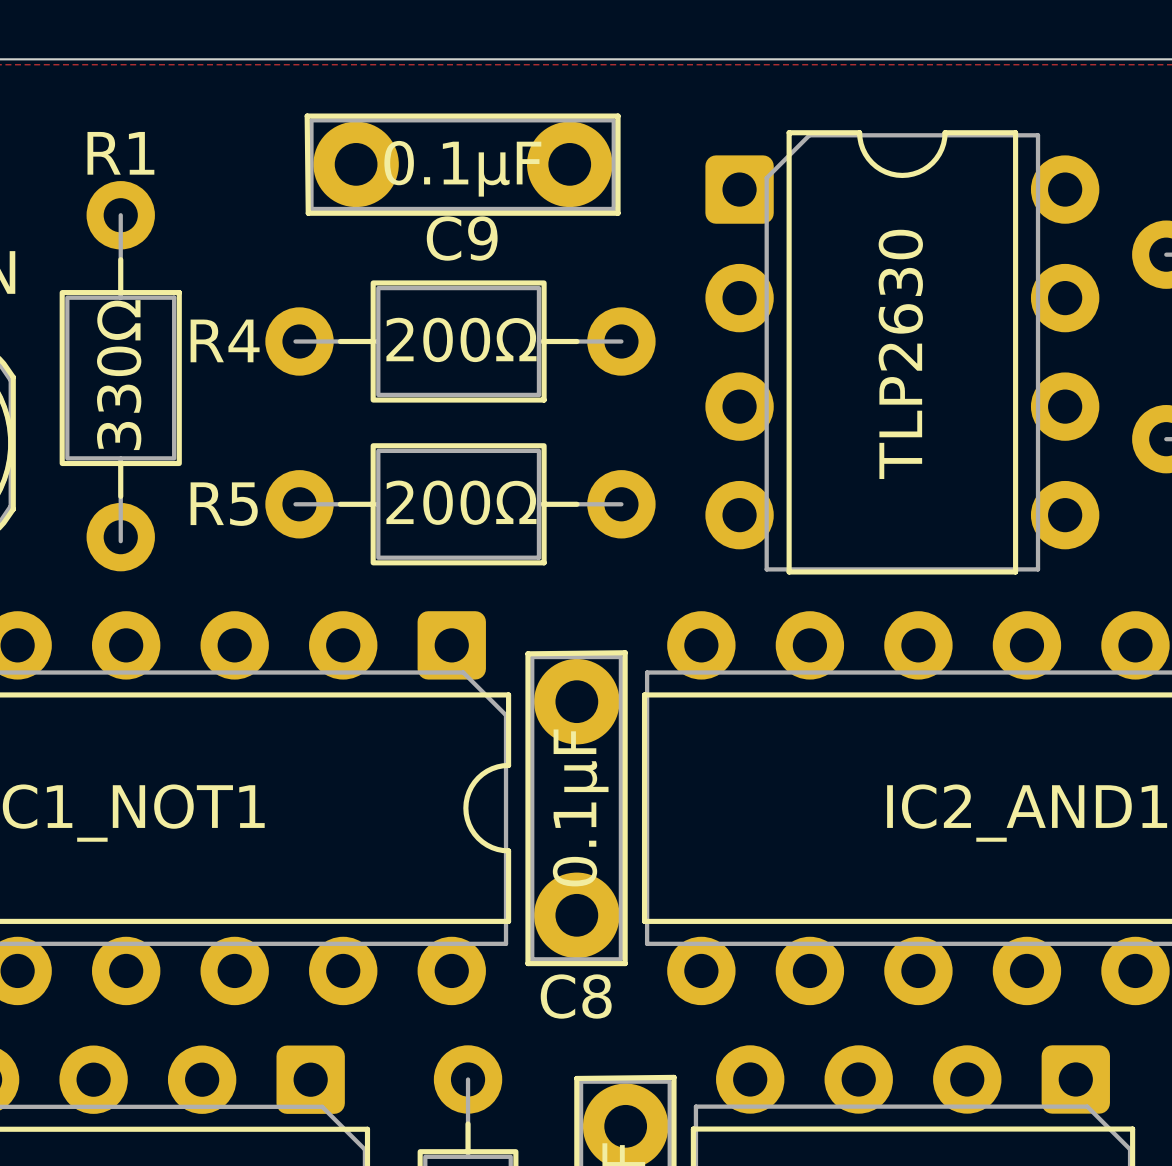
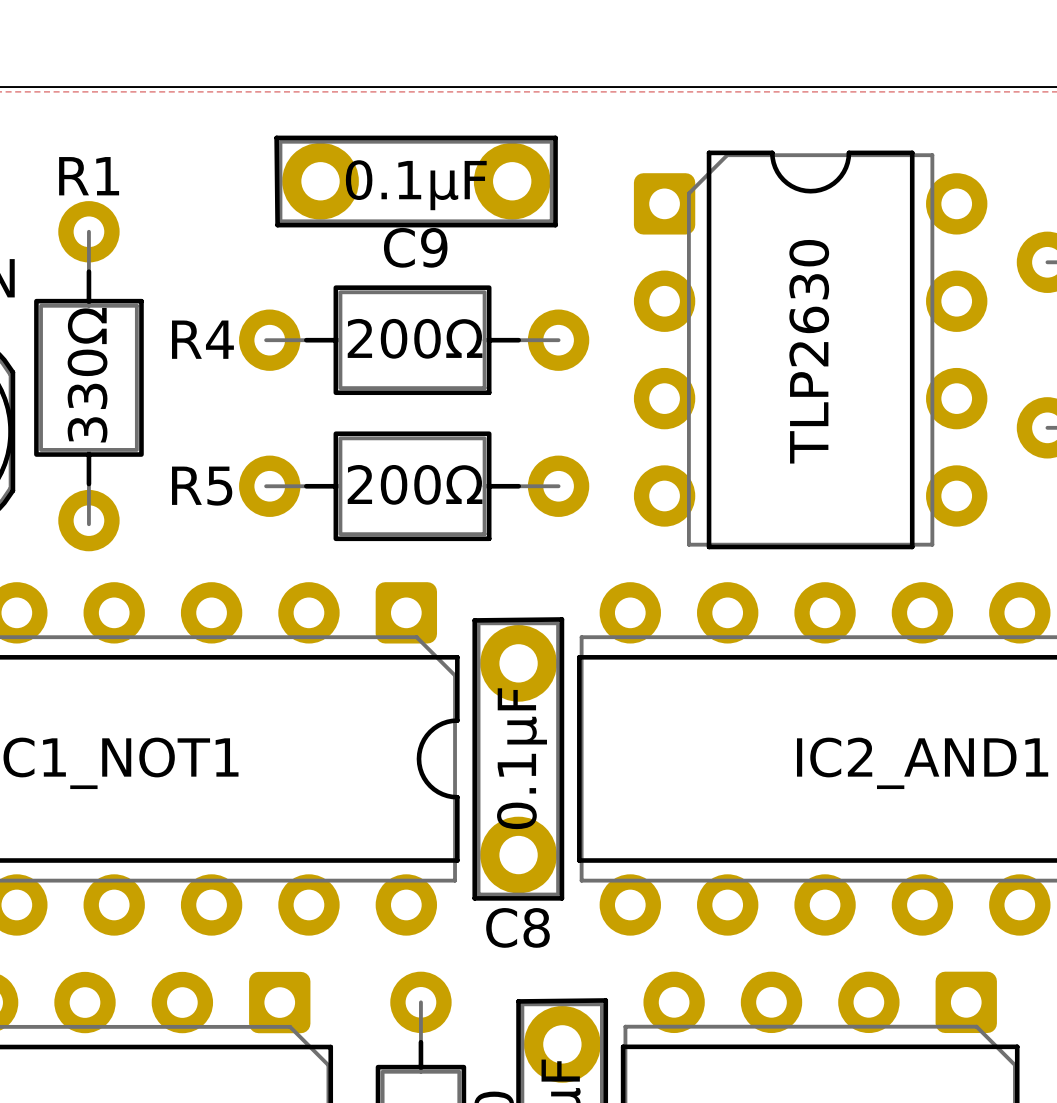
R1 position: (120, 376) -> (88, 376)

